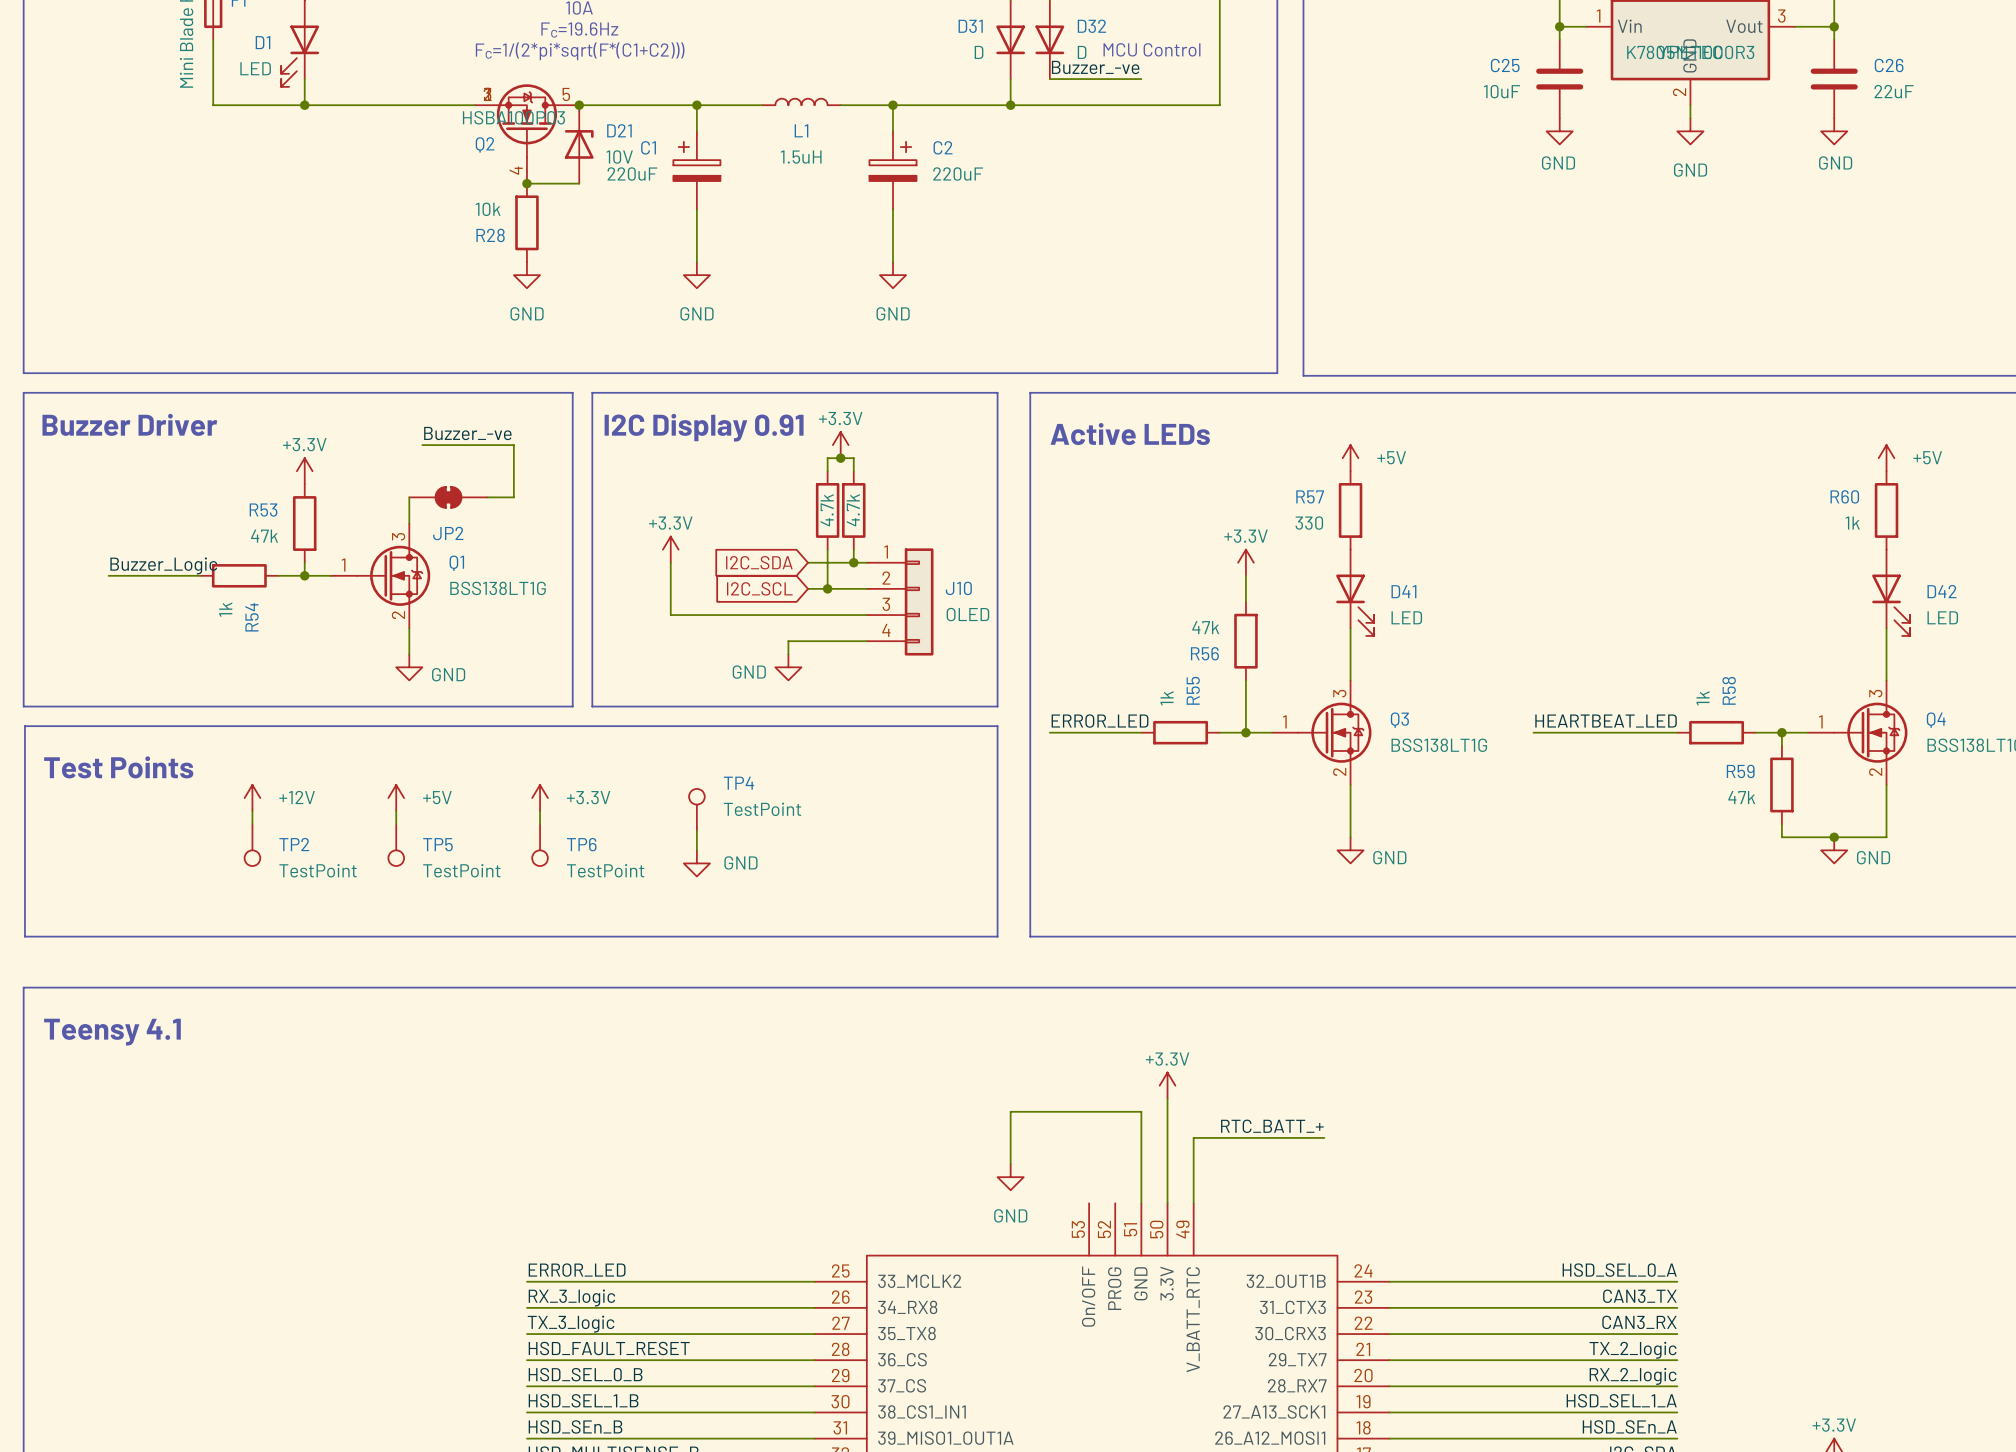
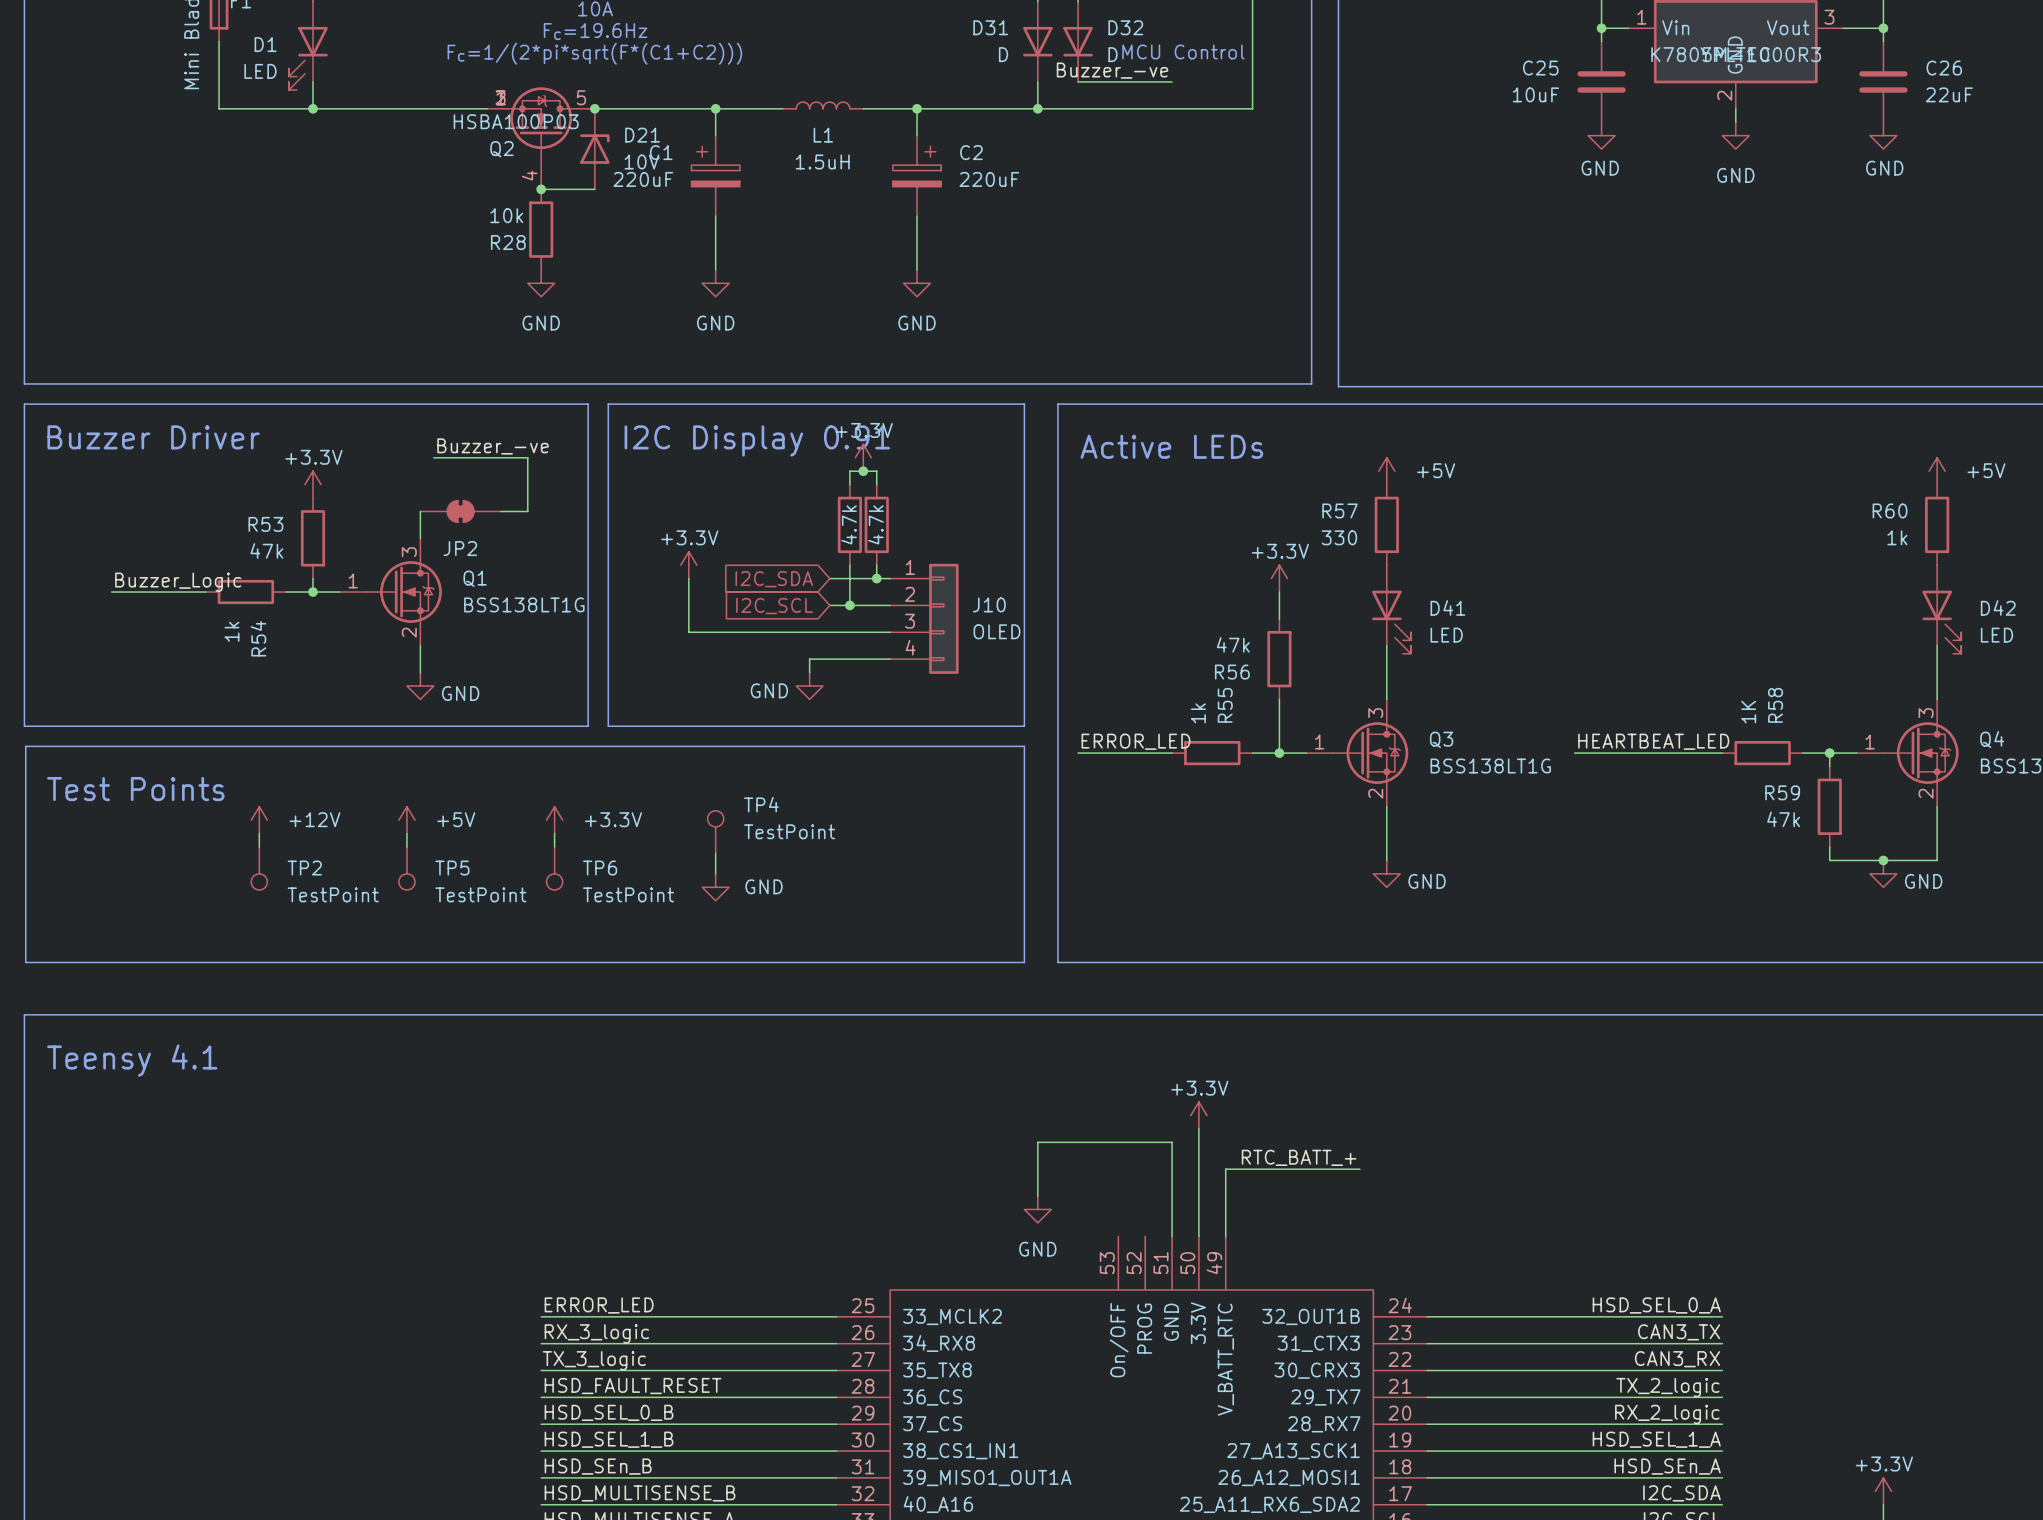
R58 value: 1k (1703, 698) -> 1K (1748, 712)

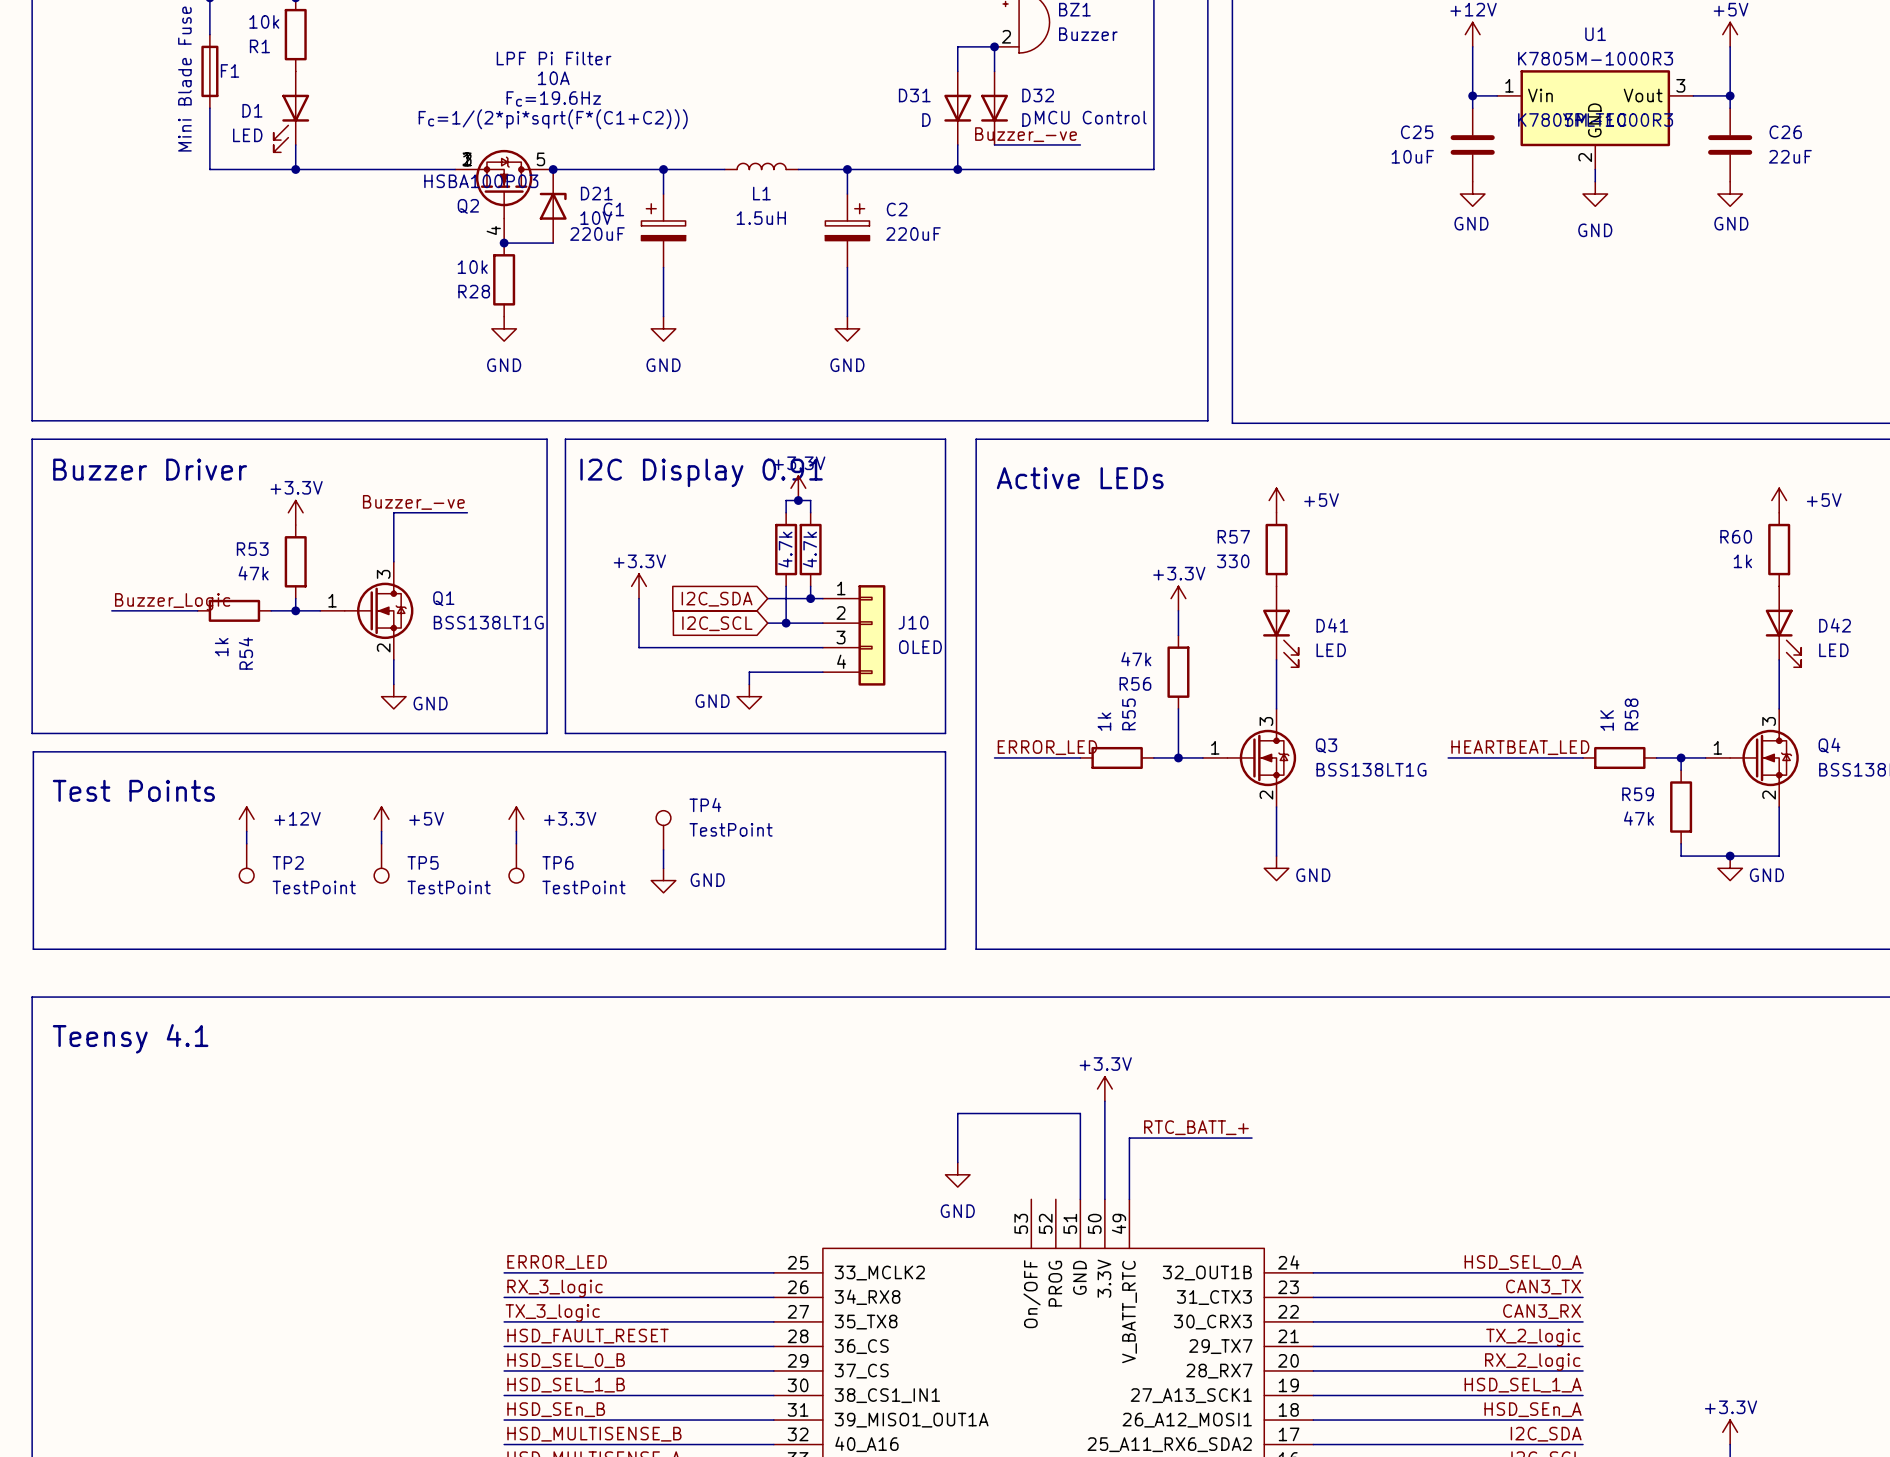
label position: Buzzer_-ve (493, 446) -> Buzzer_-ve (413, 502)
wire: (433, 457) (527, 457) (527, 511) (500, 511) -> none
wire: none -> (467, 512) (393, 512) (393, 537)
JP2: (460, 511) -> none

